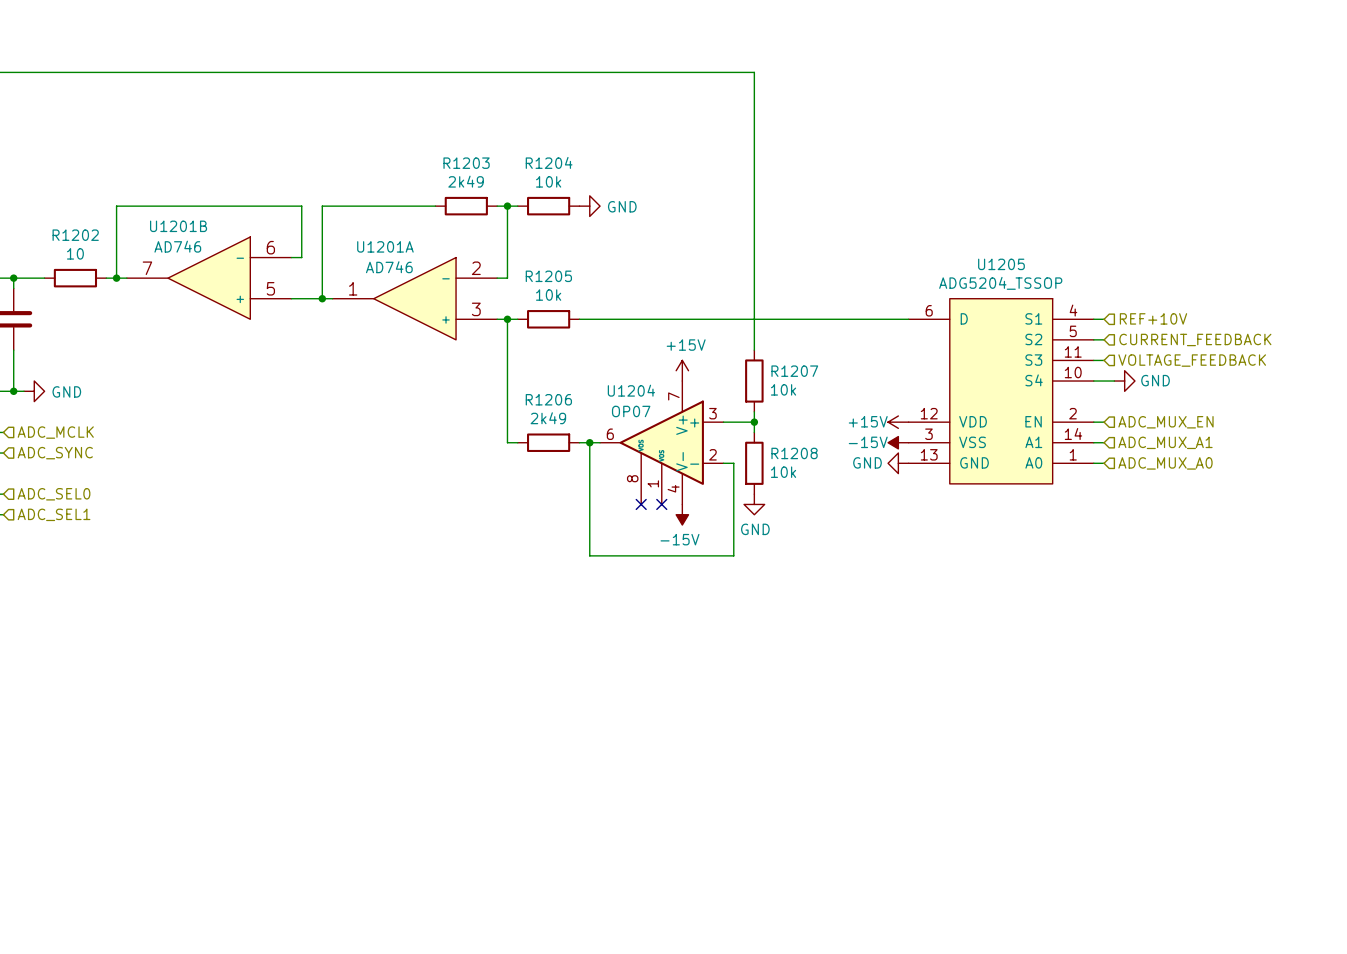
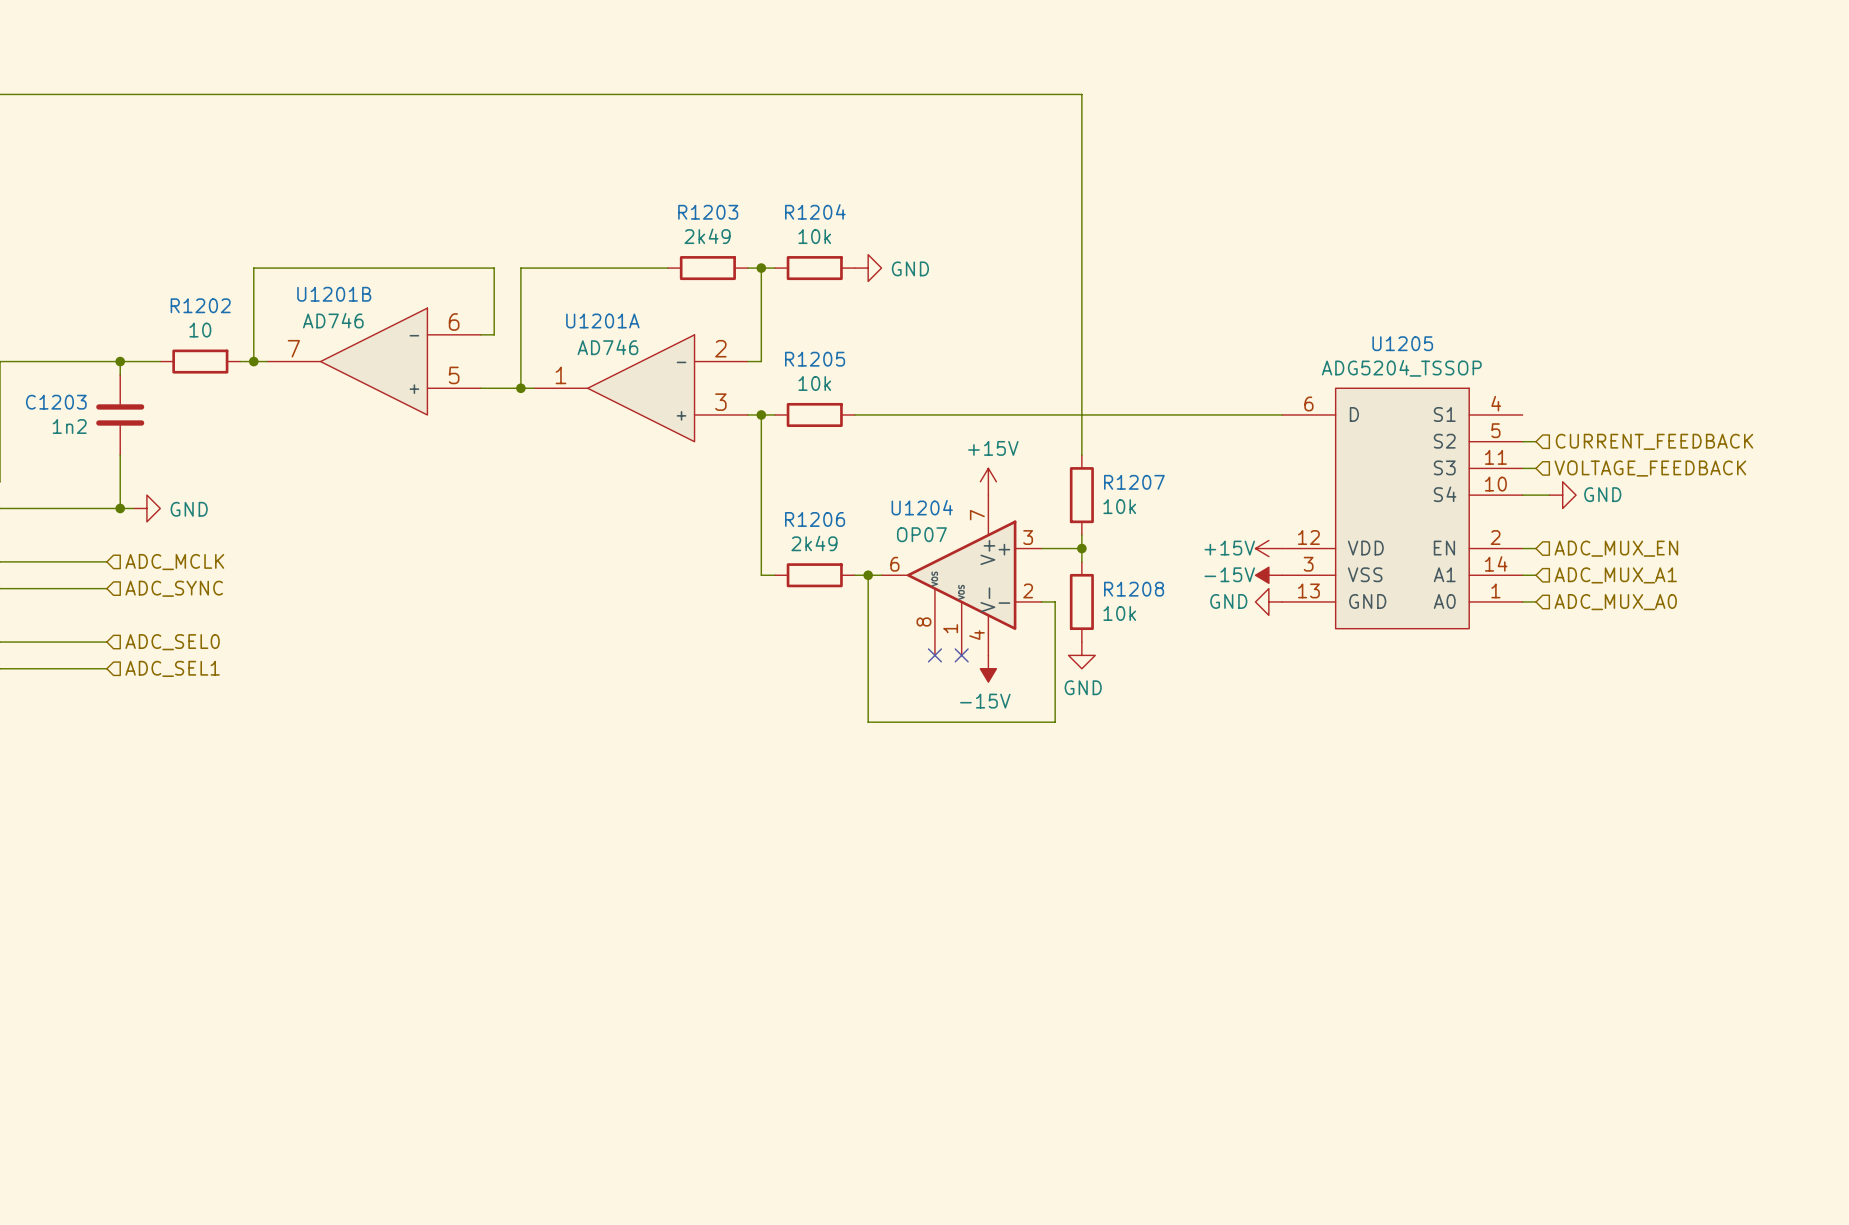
hierarchical label: REF+10V (1153, 318) -> none
wire: (1093, 319) (1104, 319) -> none

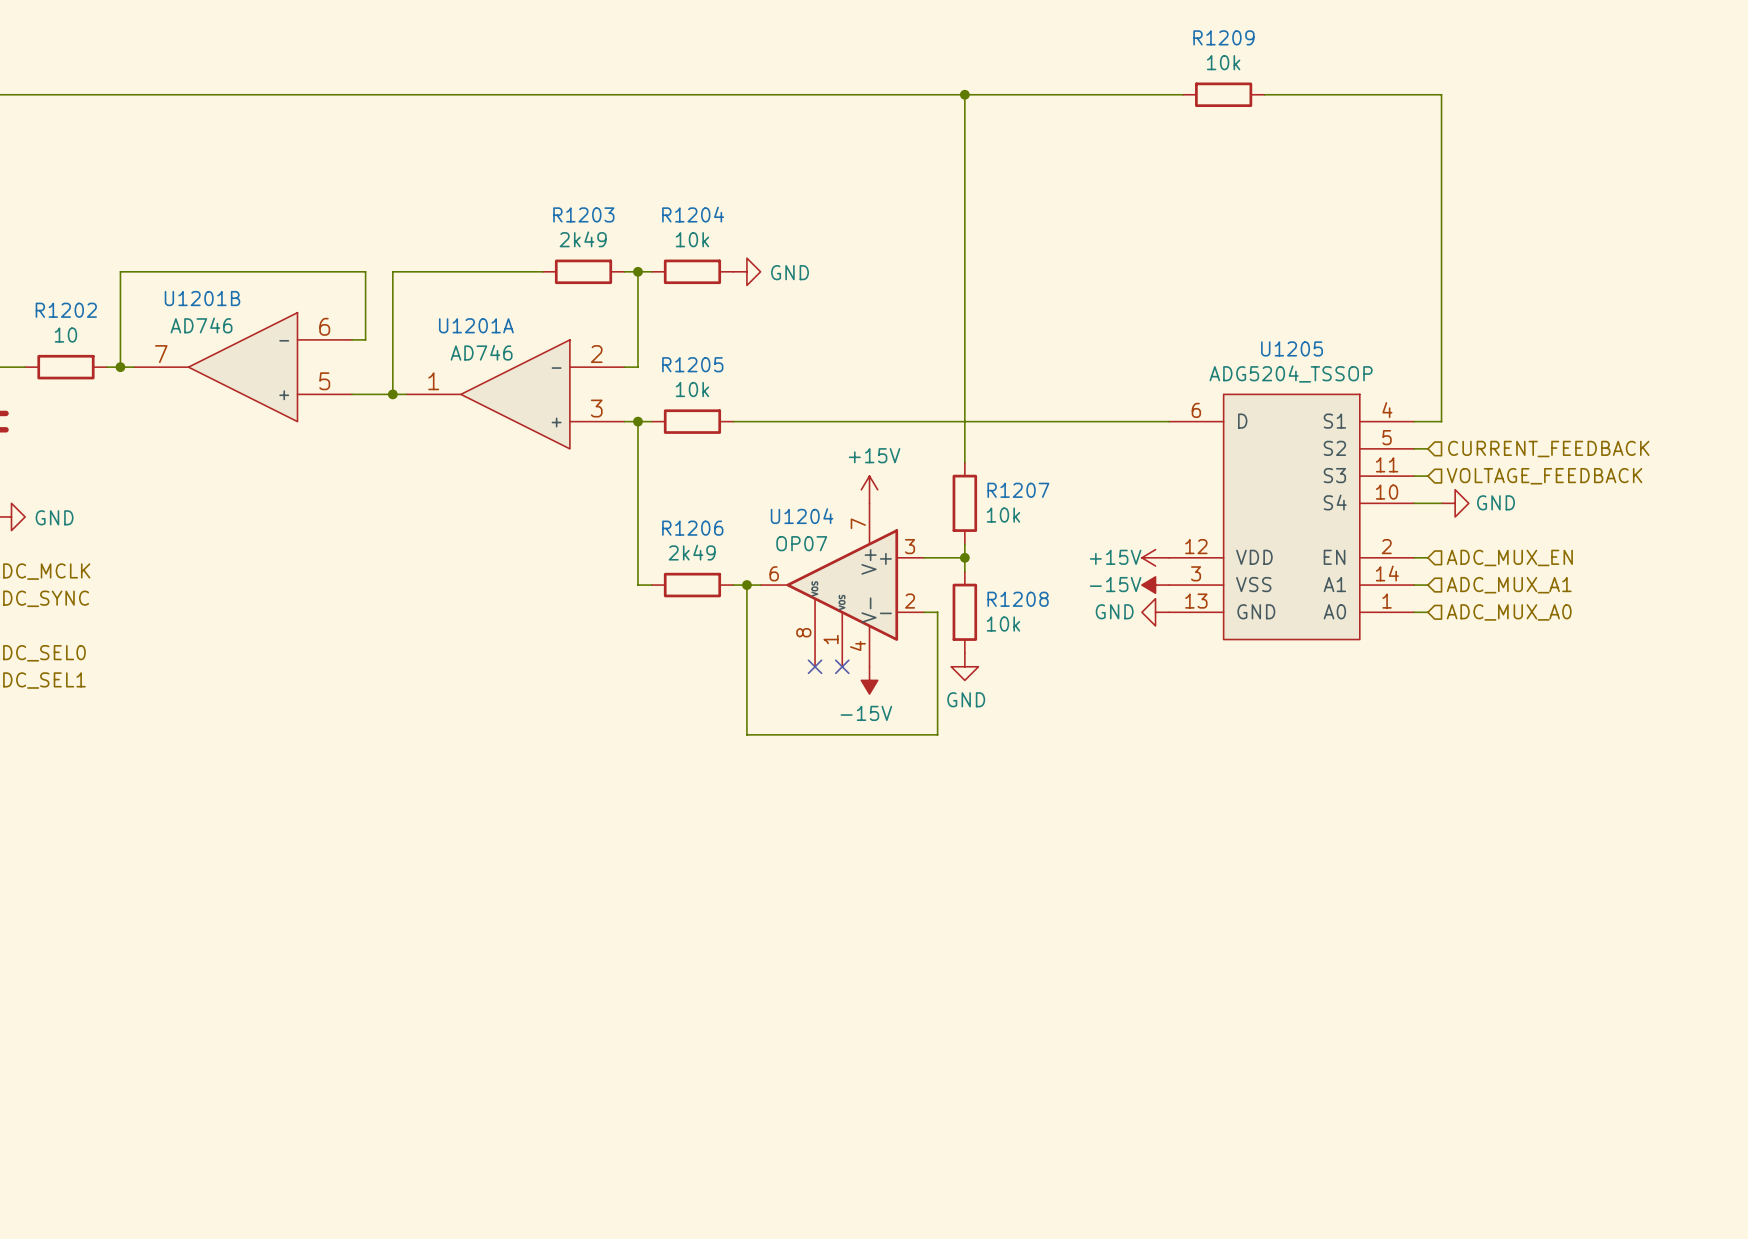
wire: none -> (964, 94) (1182, 94)
junction: none -> (964, 94)
R1209: none -> 10k (1223, 94)
wire: none -> (1264, 94) (1441, 94) (1441, 421) (1414, 421)

